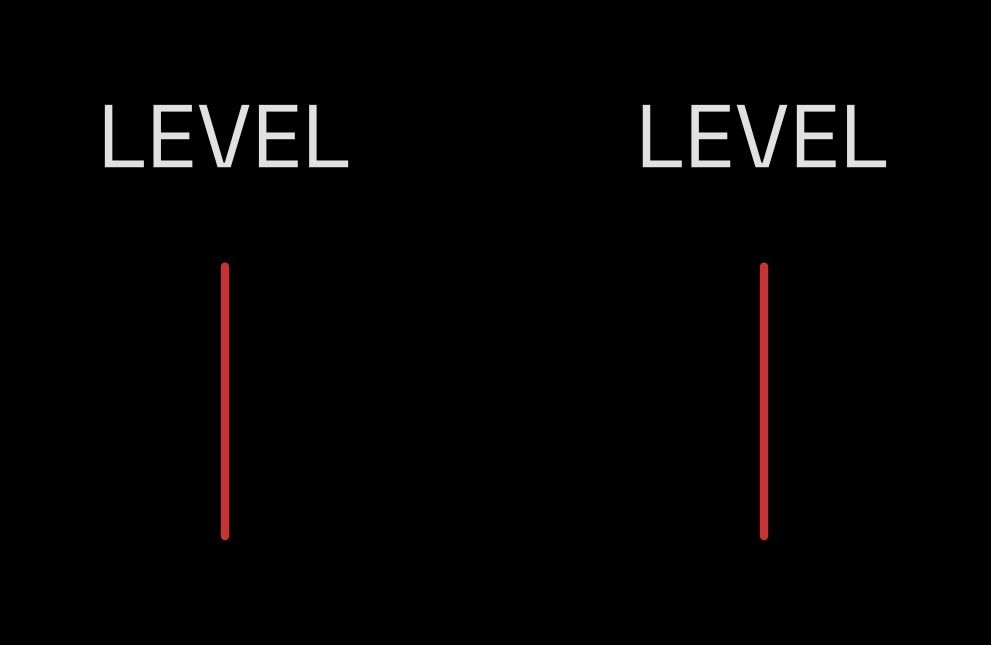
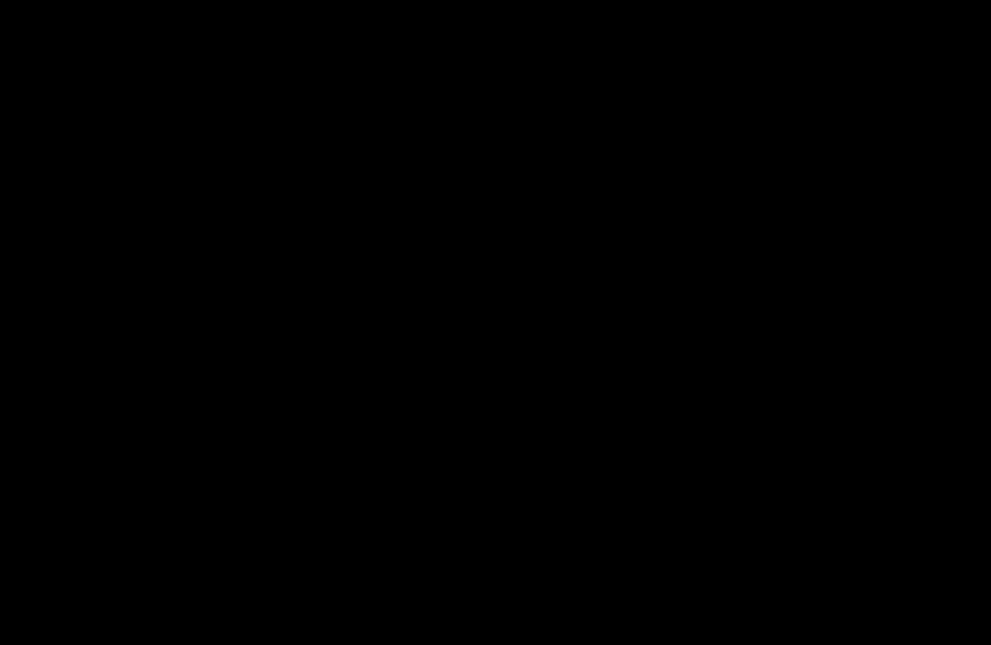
drawing: [104, 104, 349, 168] -> none
drawing: [642, 104, 887, 168] -> none
track: (224, 266) (224, 536) -> none
track: (764, 266) (764, 536) -> none

